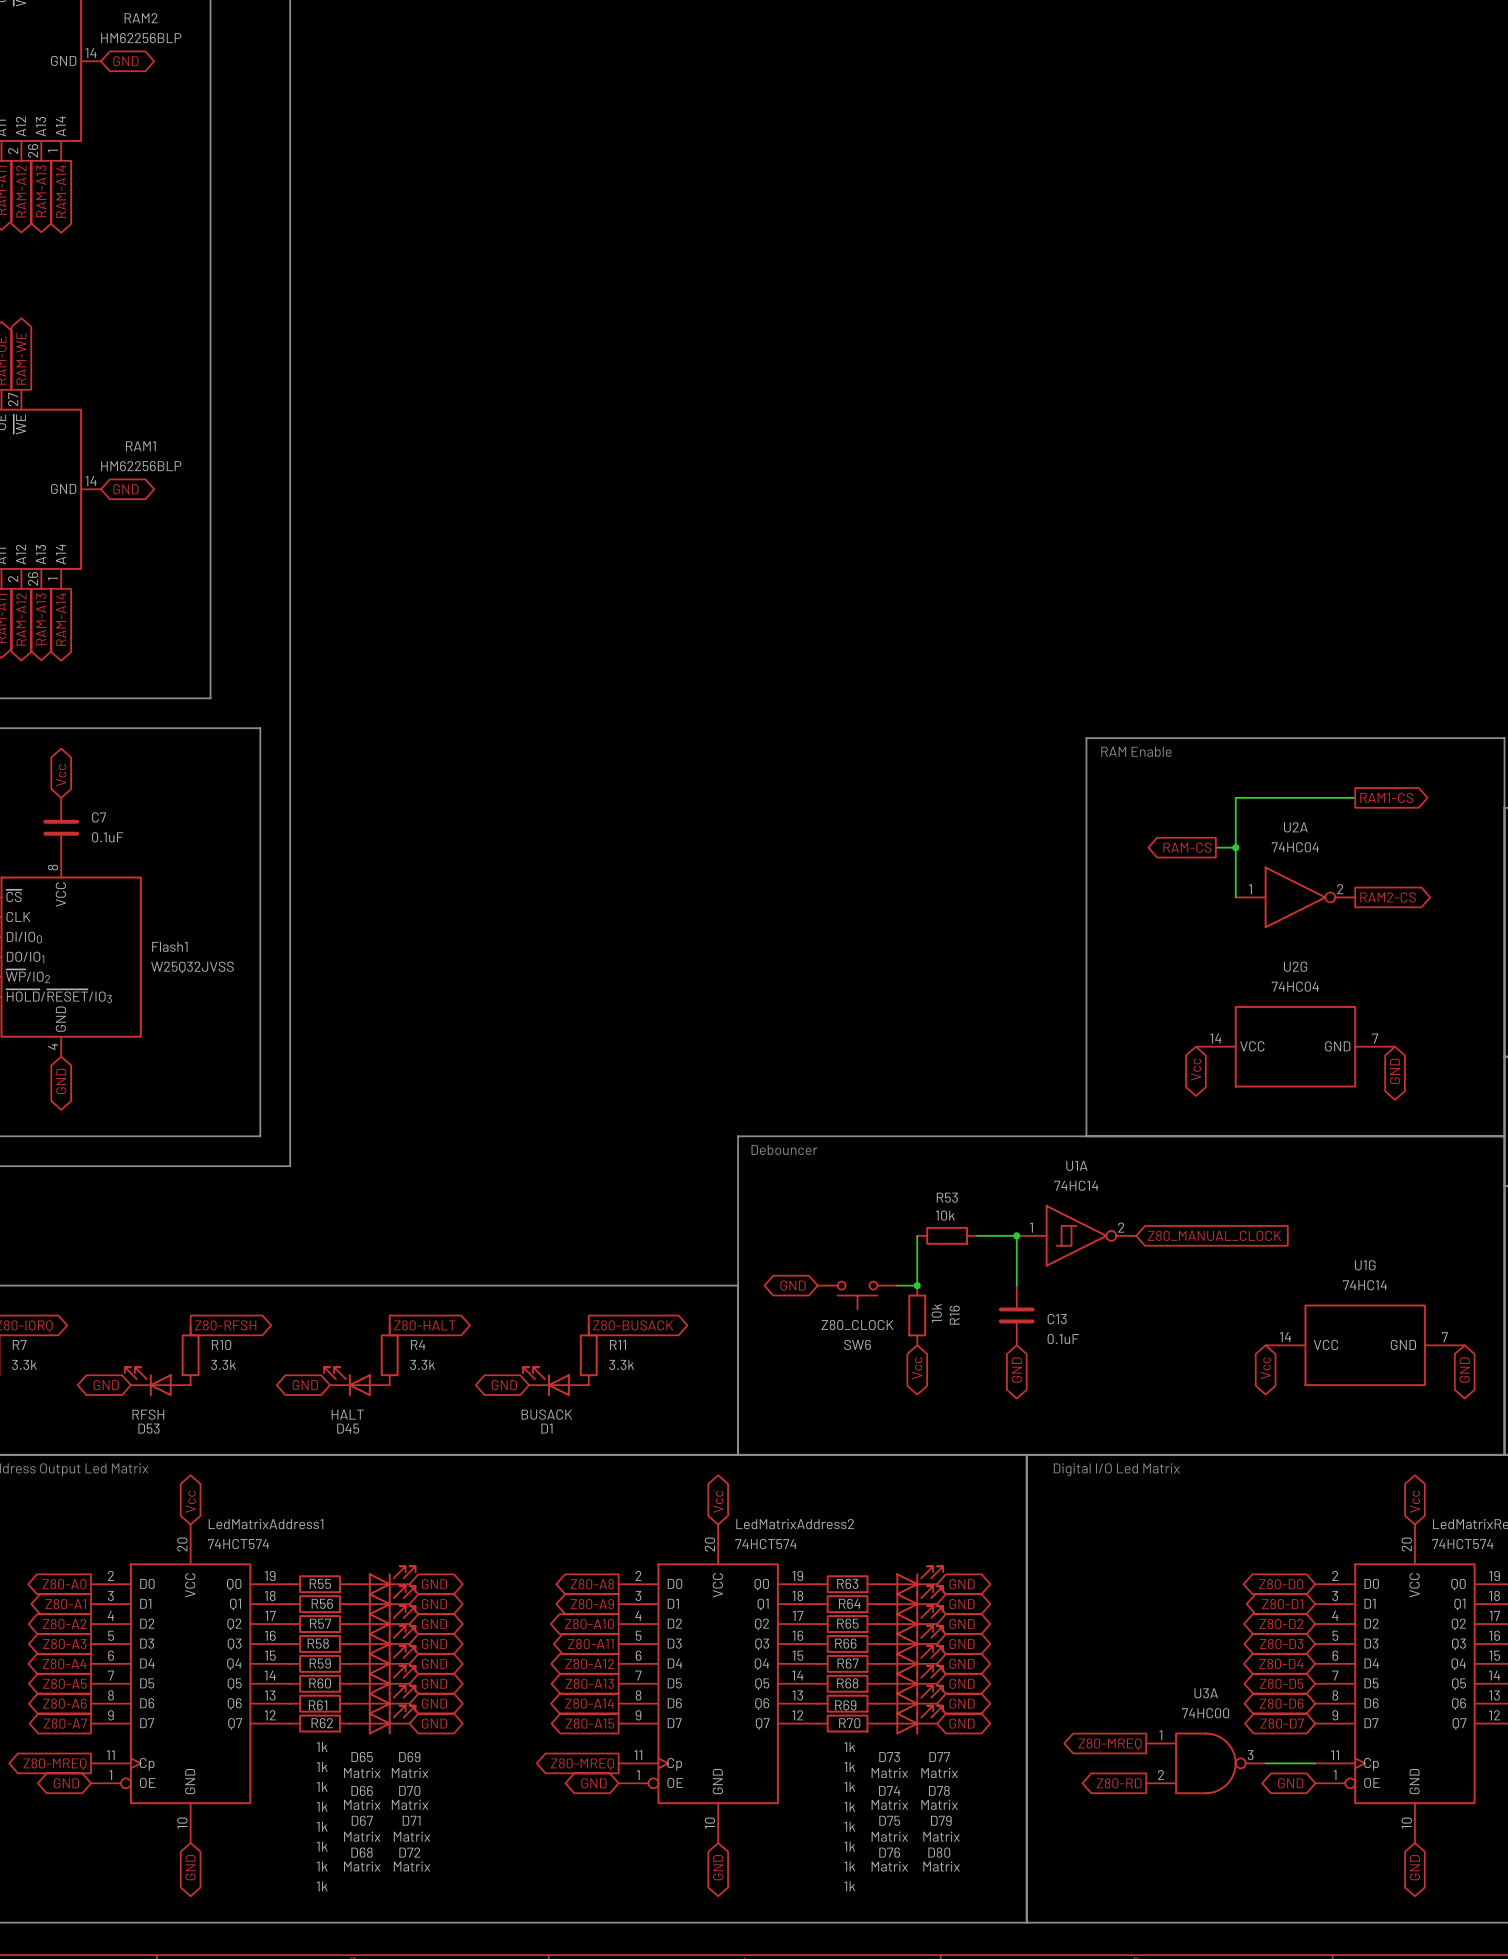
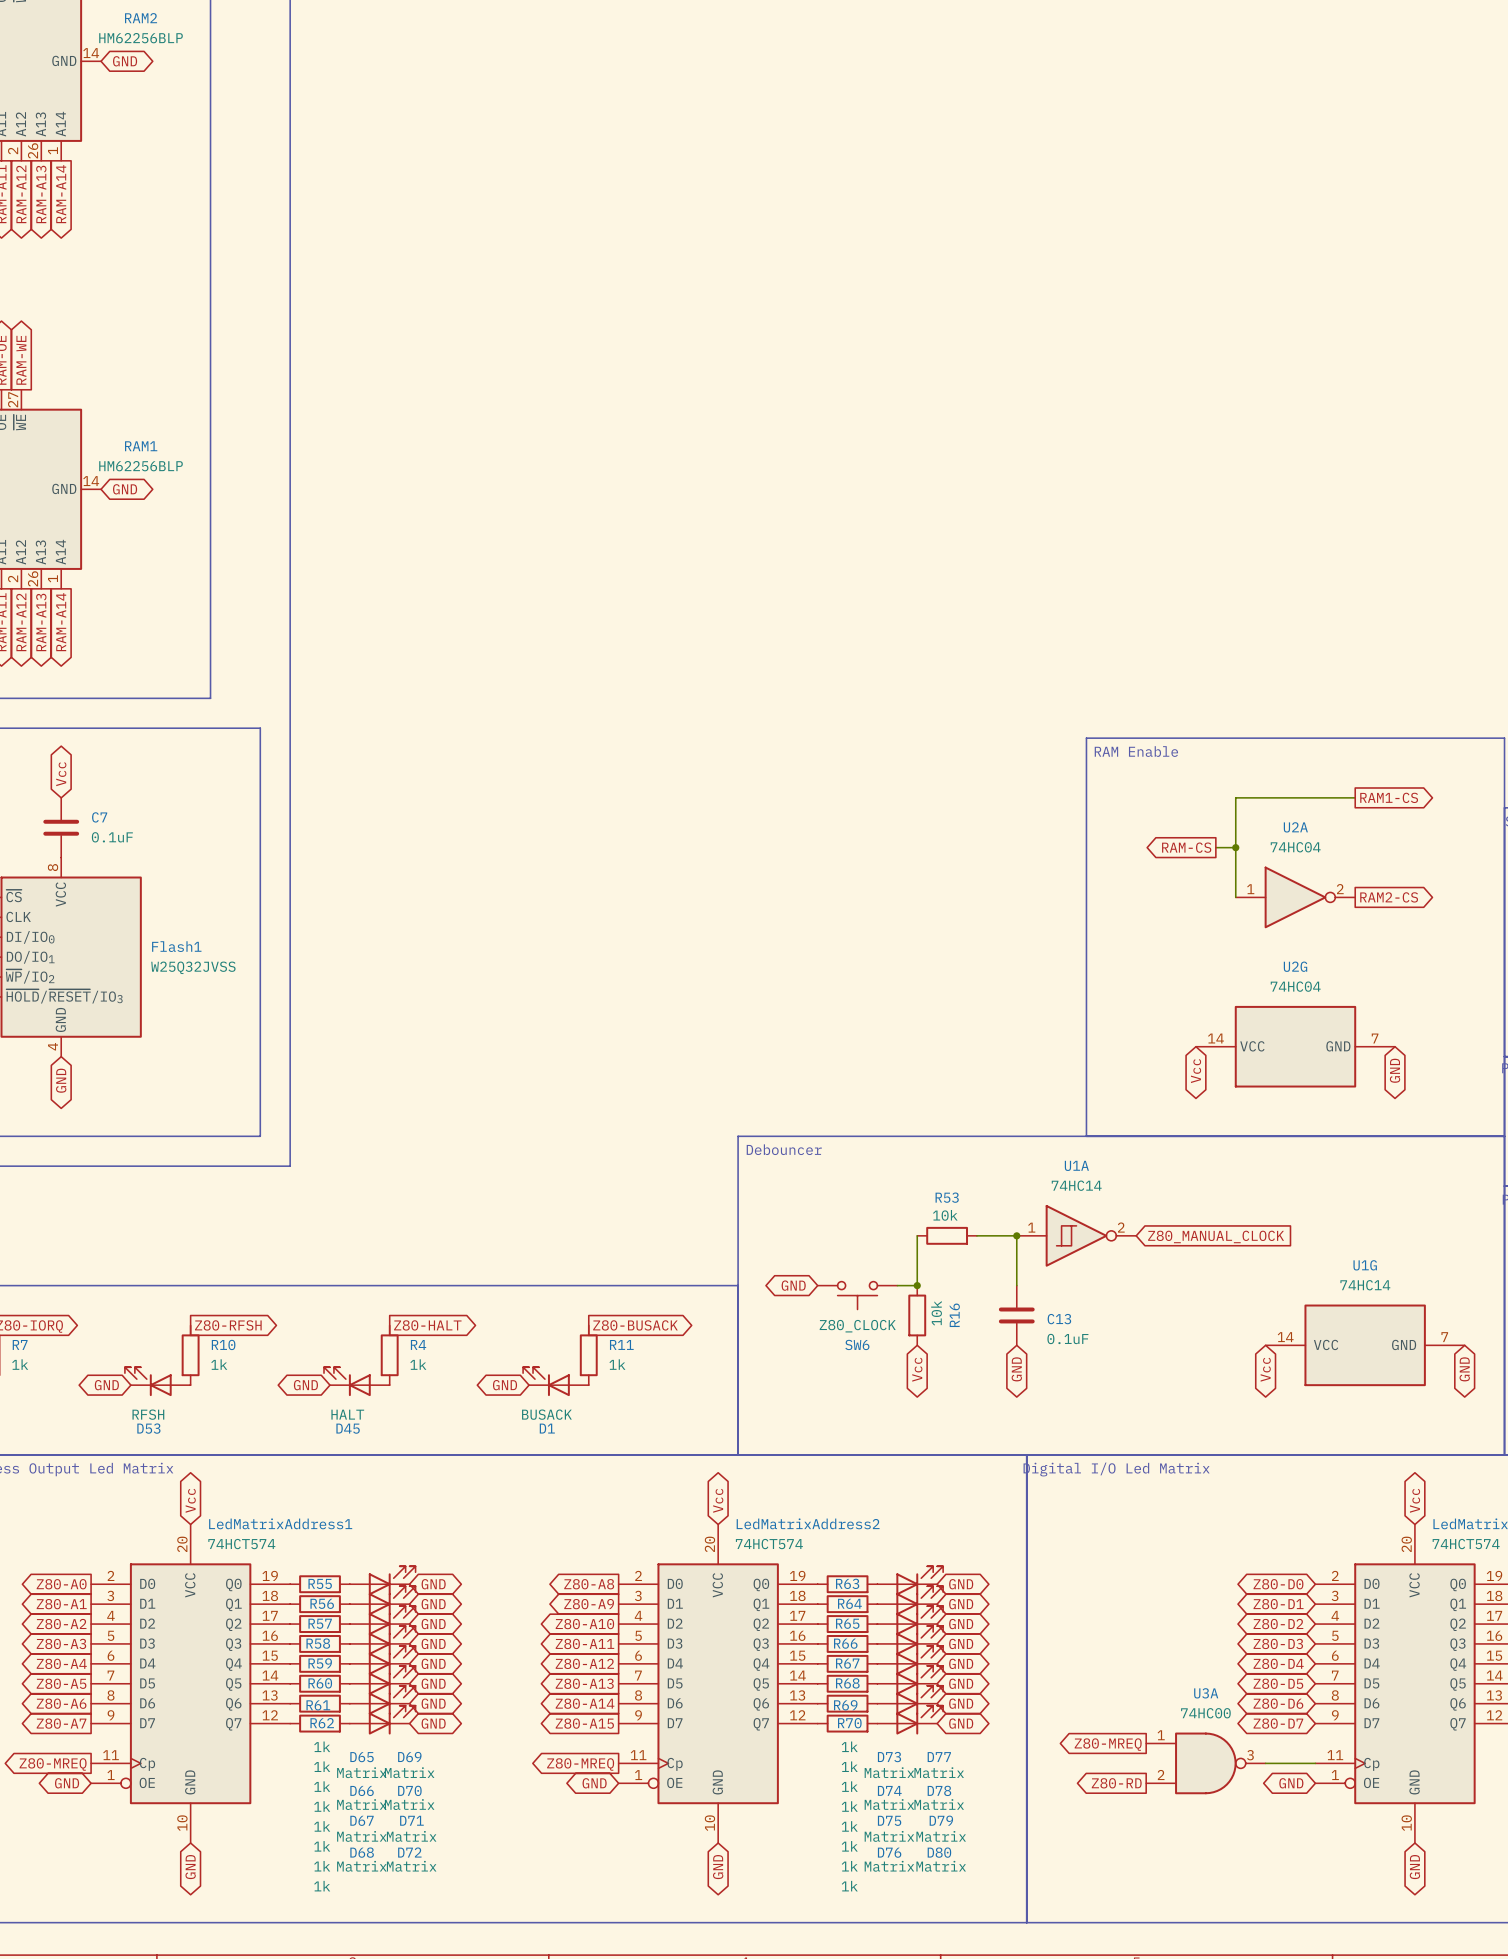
R7 value: 3.3k (24, 1364) -> 1k (20, 1364)
R10 value: 3.3k (223, 1364) -> 1k (219, 1364)
R4 value: 3.3k (422, 1364) -> 1k (418, 1364)
R11 value: 3.3k (621, 1364) -> 1k (617, 1364)

